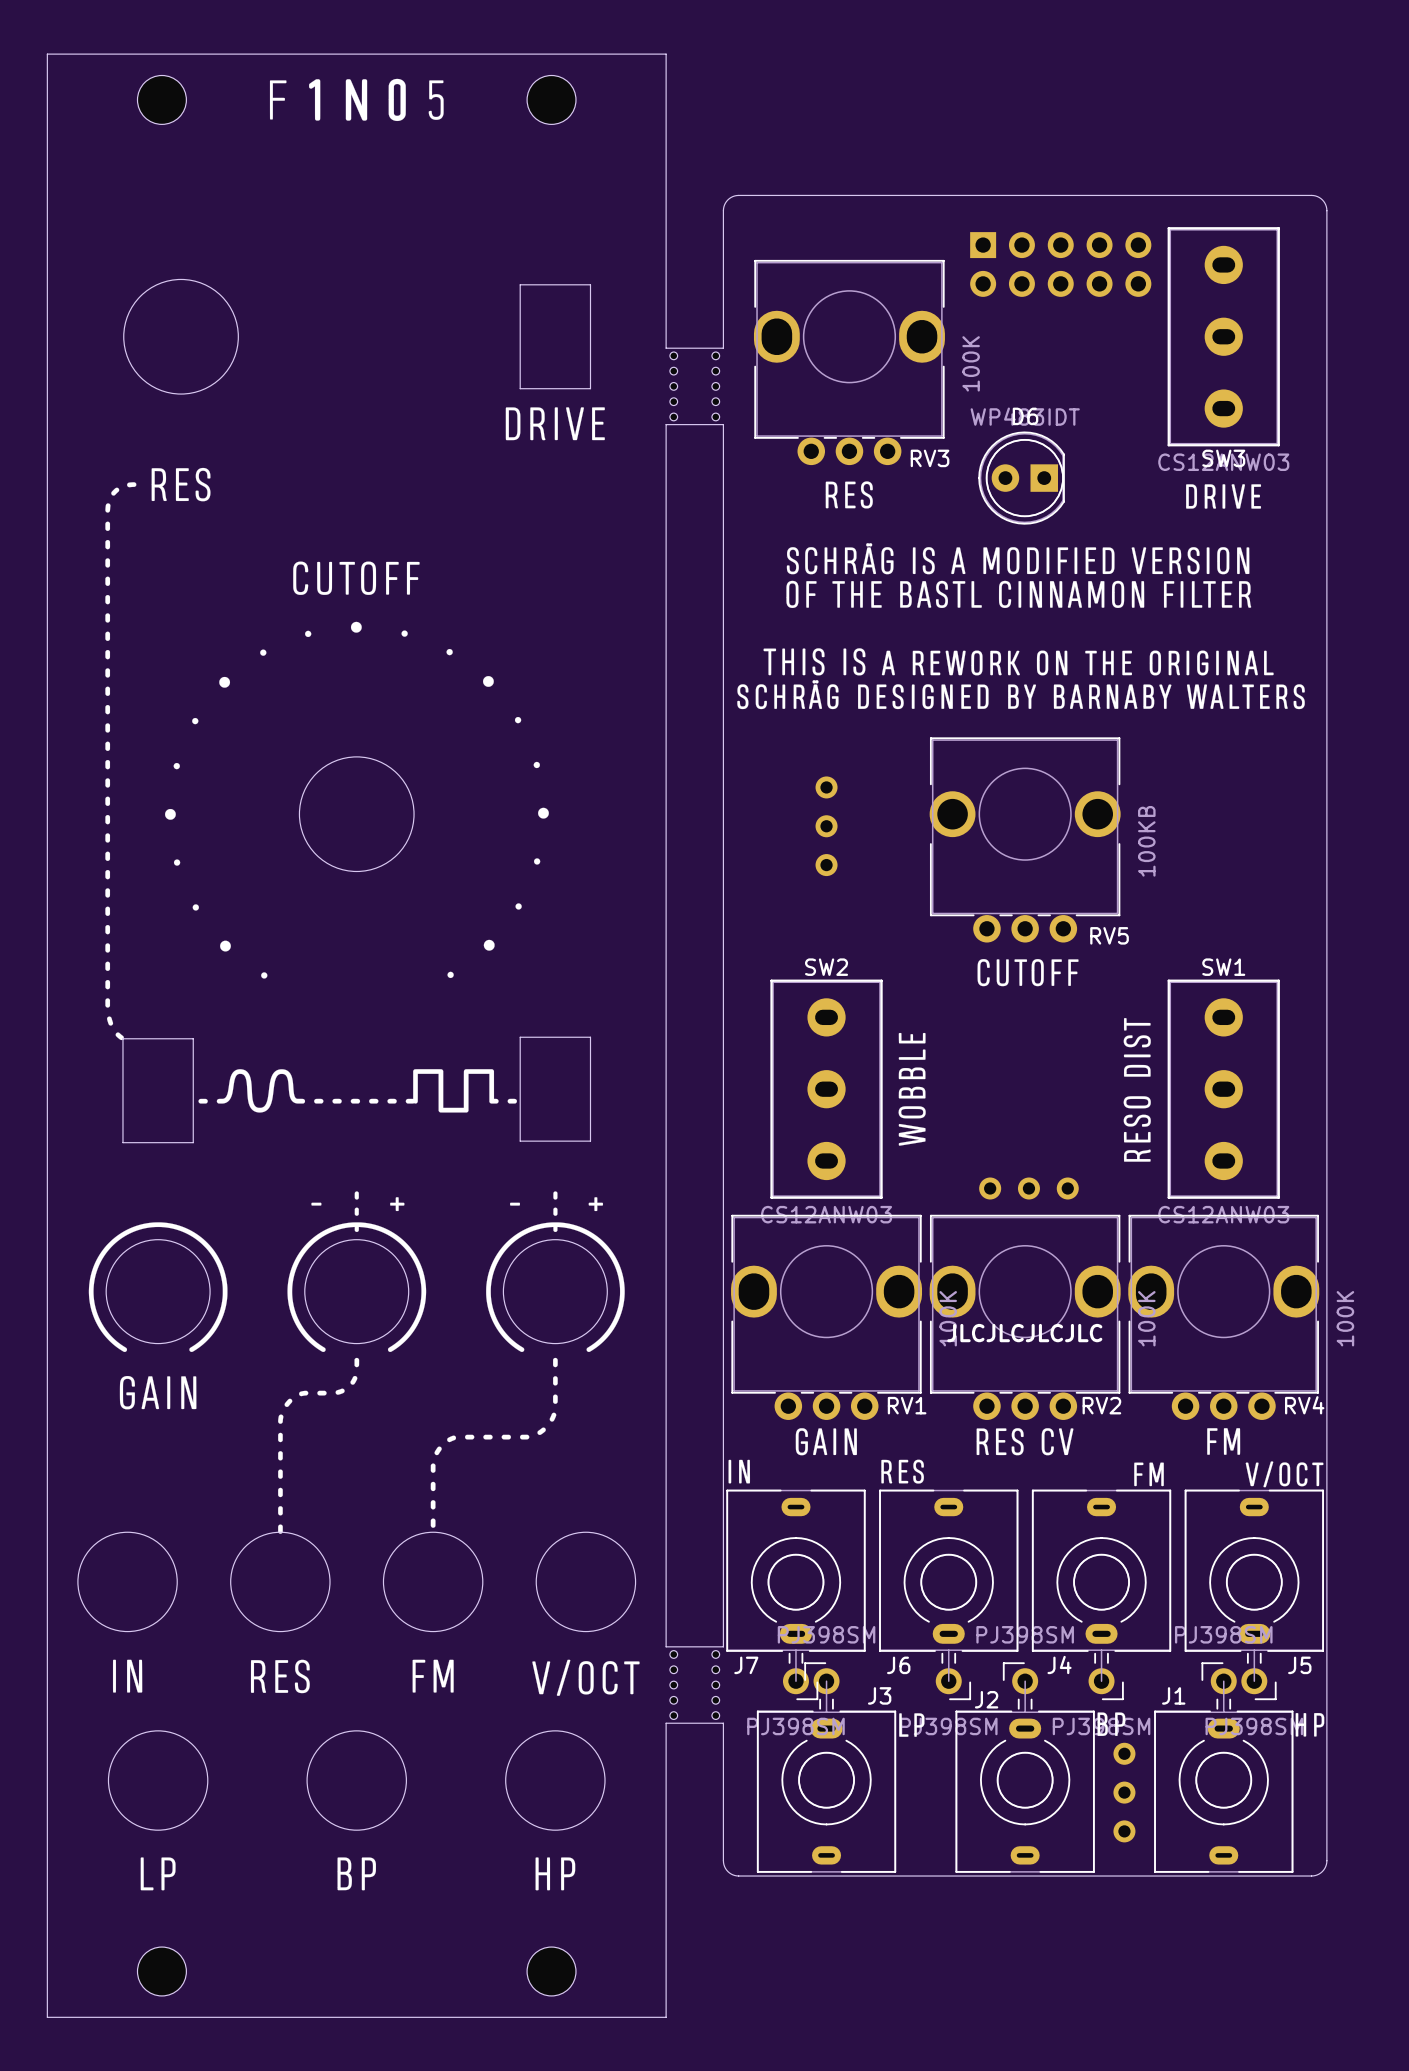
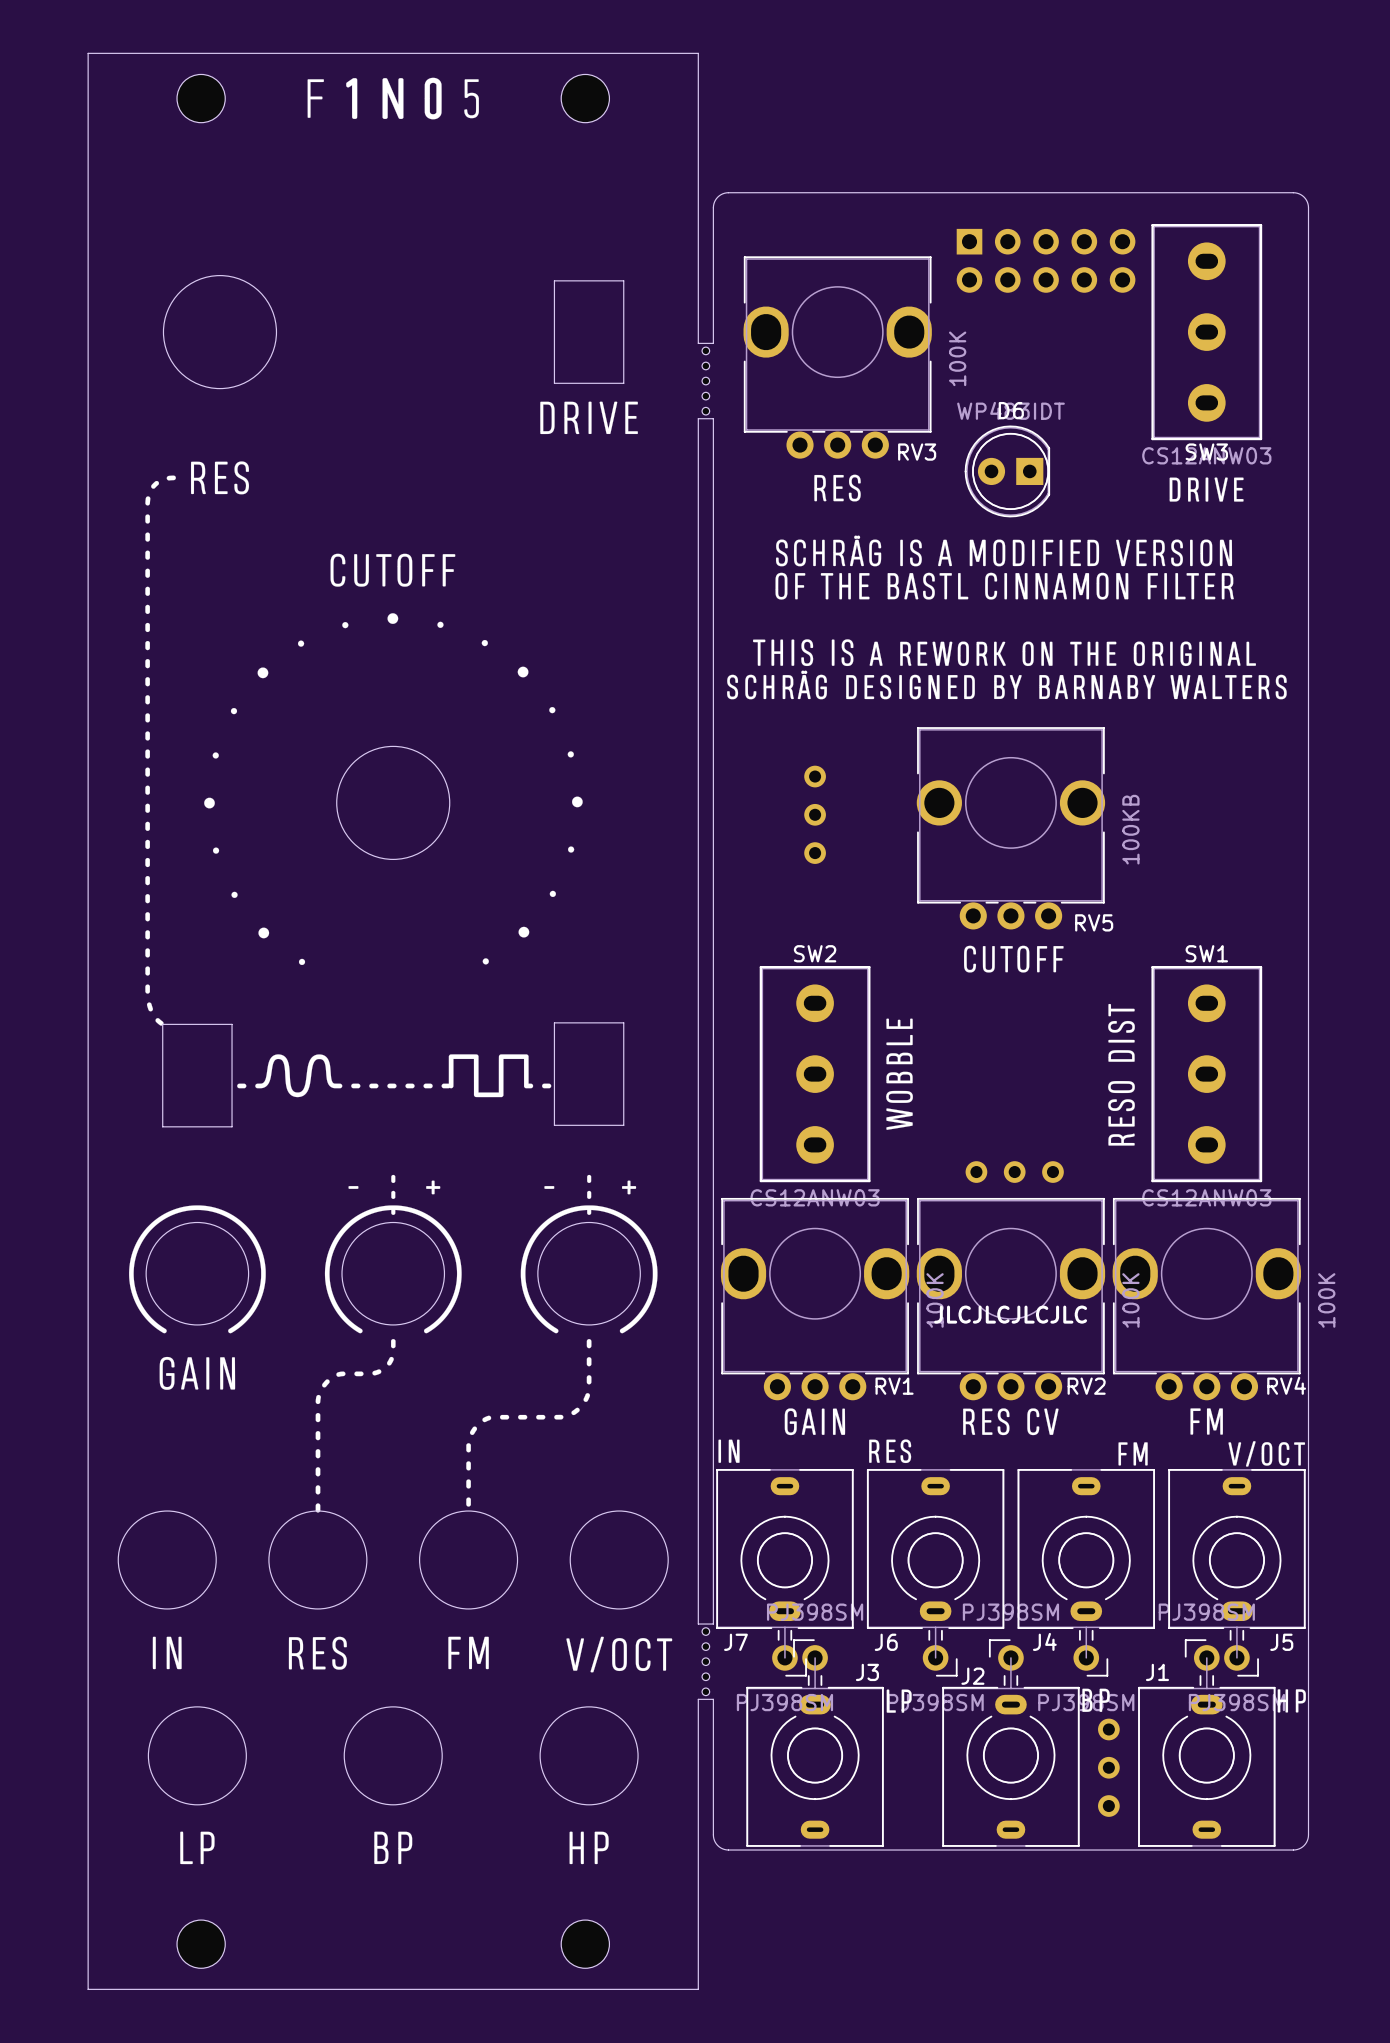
board edge: (89, 54) (47, 54) (47, 2017) (89, 2017) -> (88, 53) (88, 1989)
board edge: (666, 54) (666, 348) (708, 348) -> (656, 53) (698, 53) (698, 343)
part position: (161, 99) -> (201, 98)
part position: (551, 99) -> (585, 98)
board edge: (562, 284) (520, 284) (520, 388) (562, 388) -> (554, 280) (554, 383)
board edge: (590, 284) (590, 388) -> (582, 280) (623, 280) (623, 383) (582, 383)
round board edge position: (181, 336) -> (219, 332)
part: (673, 355) -> none
part: (673, 371) -> none
part: (673, 386) -> none
part: (673, 401) -> none
part: (673, 416) -> none
board edge: (708, 424) (666, 424) (666, 1646) (708, 1646) -> (698, 418) (698, 1624)
round board edge position: (356, 814) -> (393, 802)
drawing position: (364, 984) -> (400, 970)
board edge: (562, 1037) (520, 1037) (520, 1141) (562, 1141) -> (554, 1022) (554, 1125)
board edge: (590, 1037) (590, 1141) -> (582, 1022) (623, 1022) (623, 1125) (582, 1125)
board edge: (165, 1038) (122, 1038) (122, 1142) (165, 1142) -> (162, 1024) (162, 1126)
board edge: (193, 1038) (193, 1142) -> (190, 1024) (232, 1024) (232, 1126) (190, 1126)
round board edge position: (158, 1291) -> (197, 1273)
round board edge position: (356, 1291) -> (393, 1273)
round board edge position: (555, 1291) -> (589, 1273)
round board edge position: (127, 1581) -> (167, 1559)
round board edge position: (280, 1581) -> (317, 1559)
round board edge position: (433, 1581) -> (468, 1559)
round board edge position: (585, 1581) -> (619, 1559)
part: (673, 1654) -> none
part: (673, 1669) -> none
part: (673, 1685) -> none
part: (673, 1700) -> none
part: (673, 1715) -> none
board edge: (708, 1723) (666, 1723) (666, 2017) -> (698, 1699) (698, 1989) (656, 1989)
round board edge position: (158, 1780) -> (197, 1755)
round board edge position: (356, 1780) -> (393, 1755)
round board edge position: (555, 1780) -> (589, 1755)
part position: (161, 1971) -> (201, 1944)
part position: (551, 1971) -> (585, 1944)

